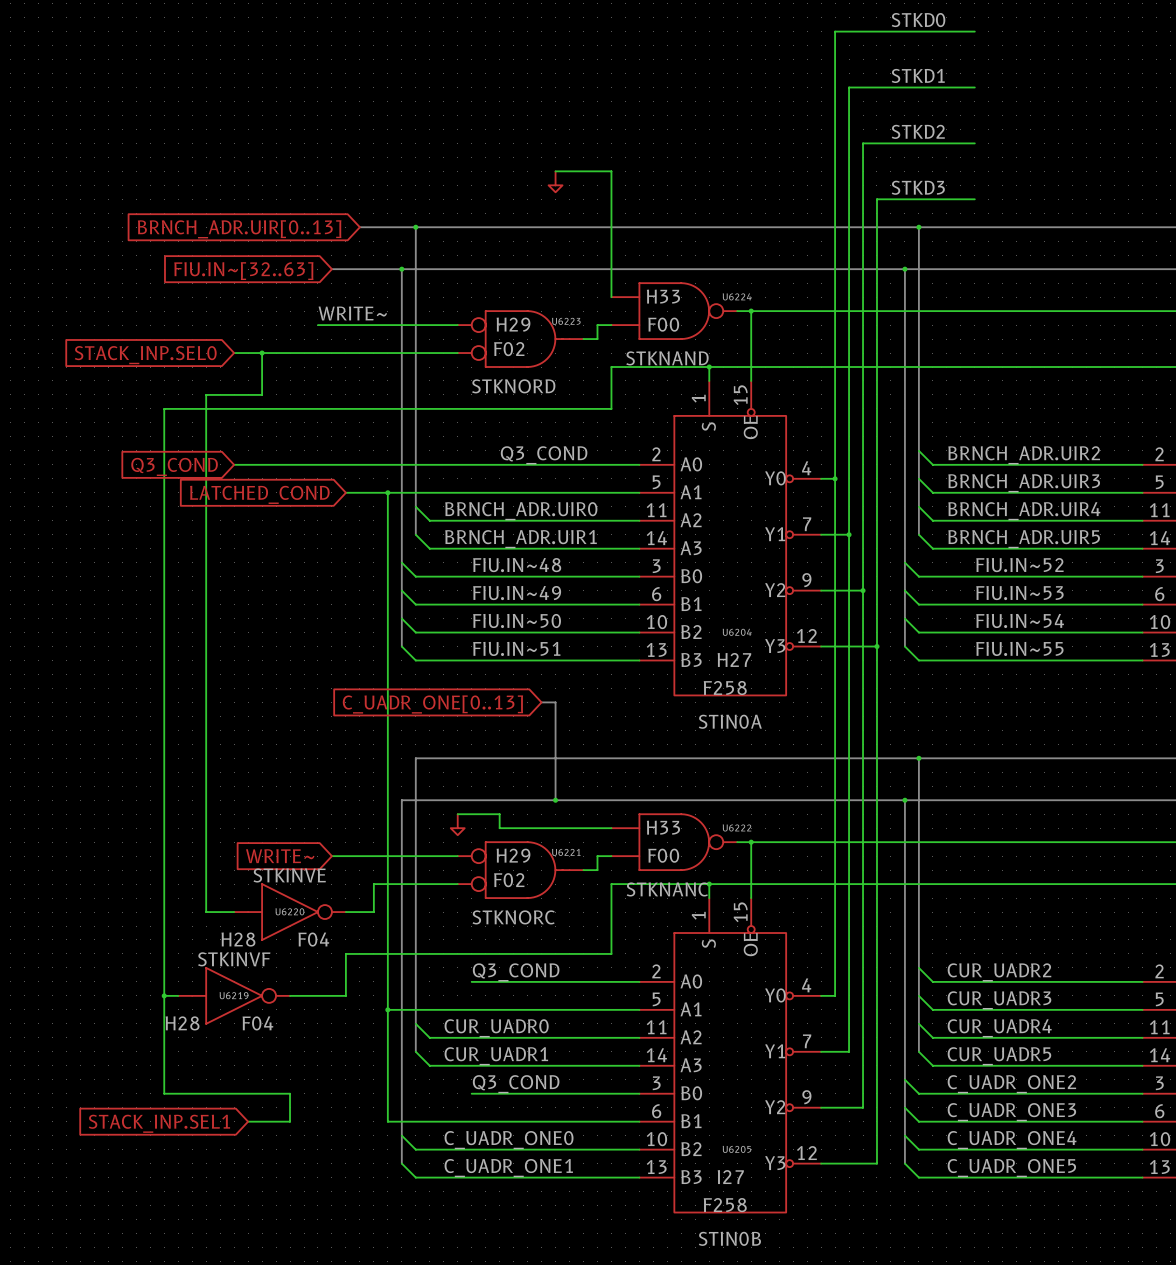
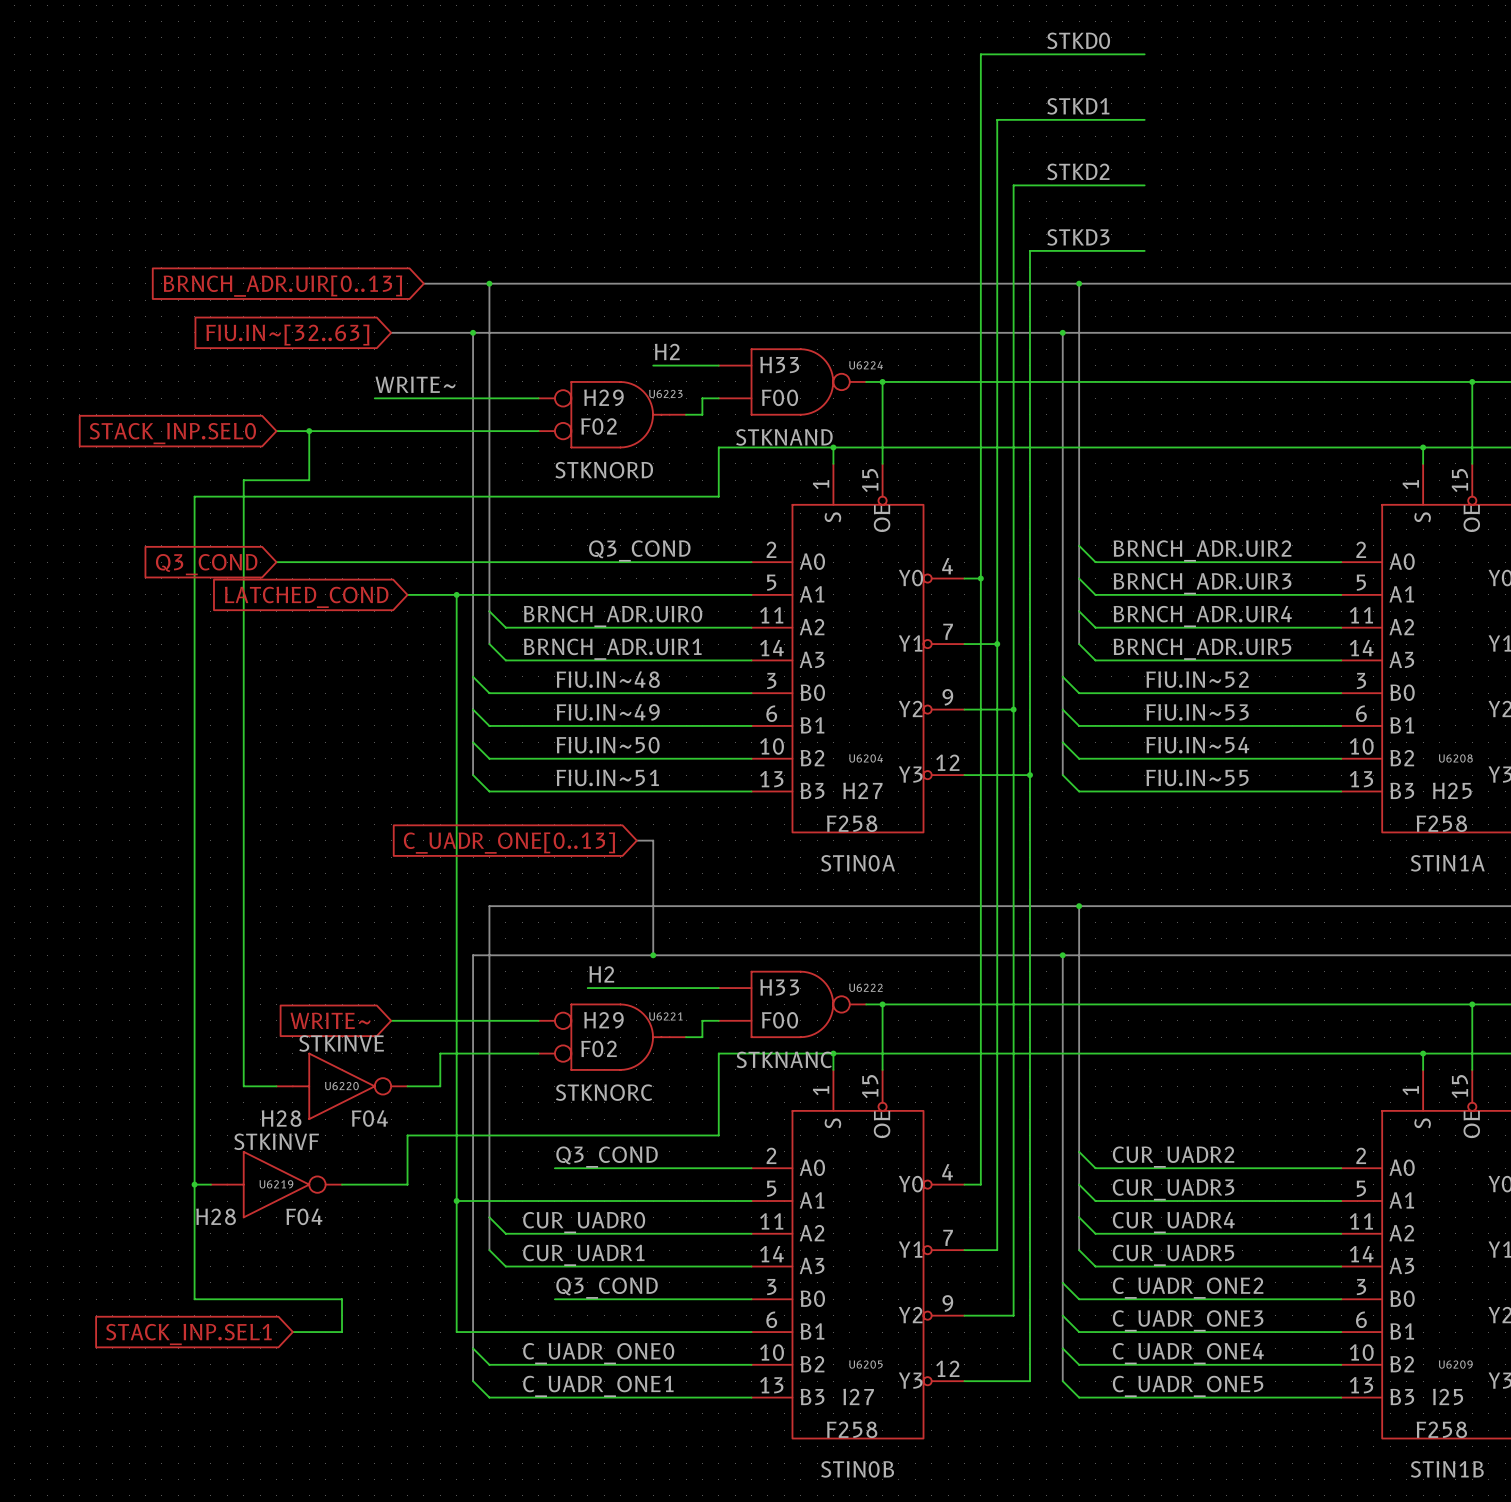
wire: (555, 171) (611, 171) (611, 297) -> (653, 365) (718, 365)
power symbol: (555, 182) -> none
label: none -> H2 (667, 351)
wire: (457, 814) (499, 814) (499, 828) -> none
label: none -> H2 (601, 974)
power symbol: (457, 824) -> none

